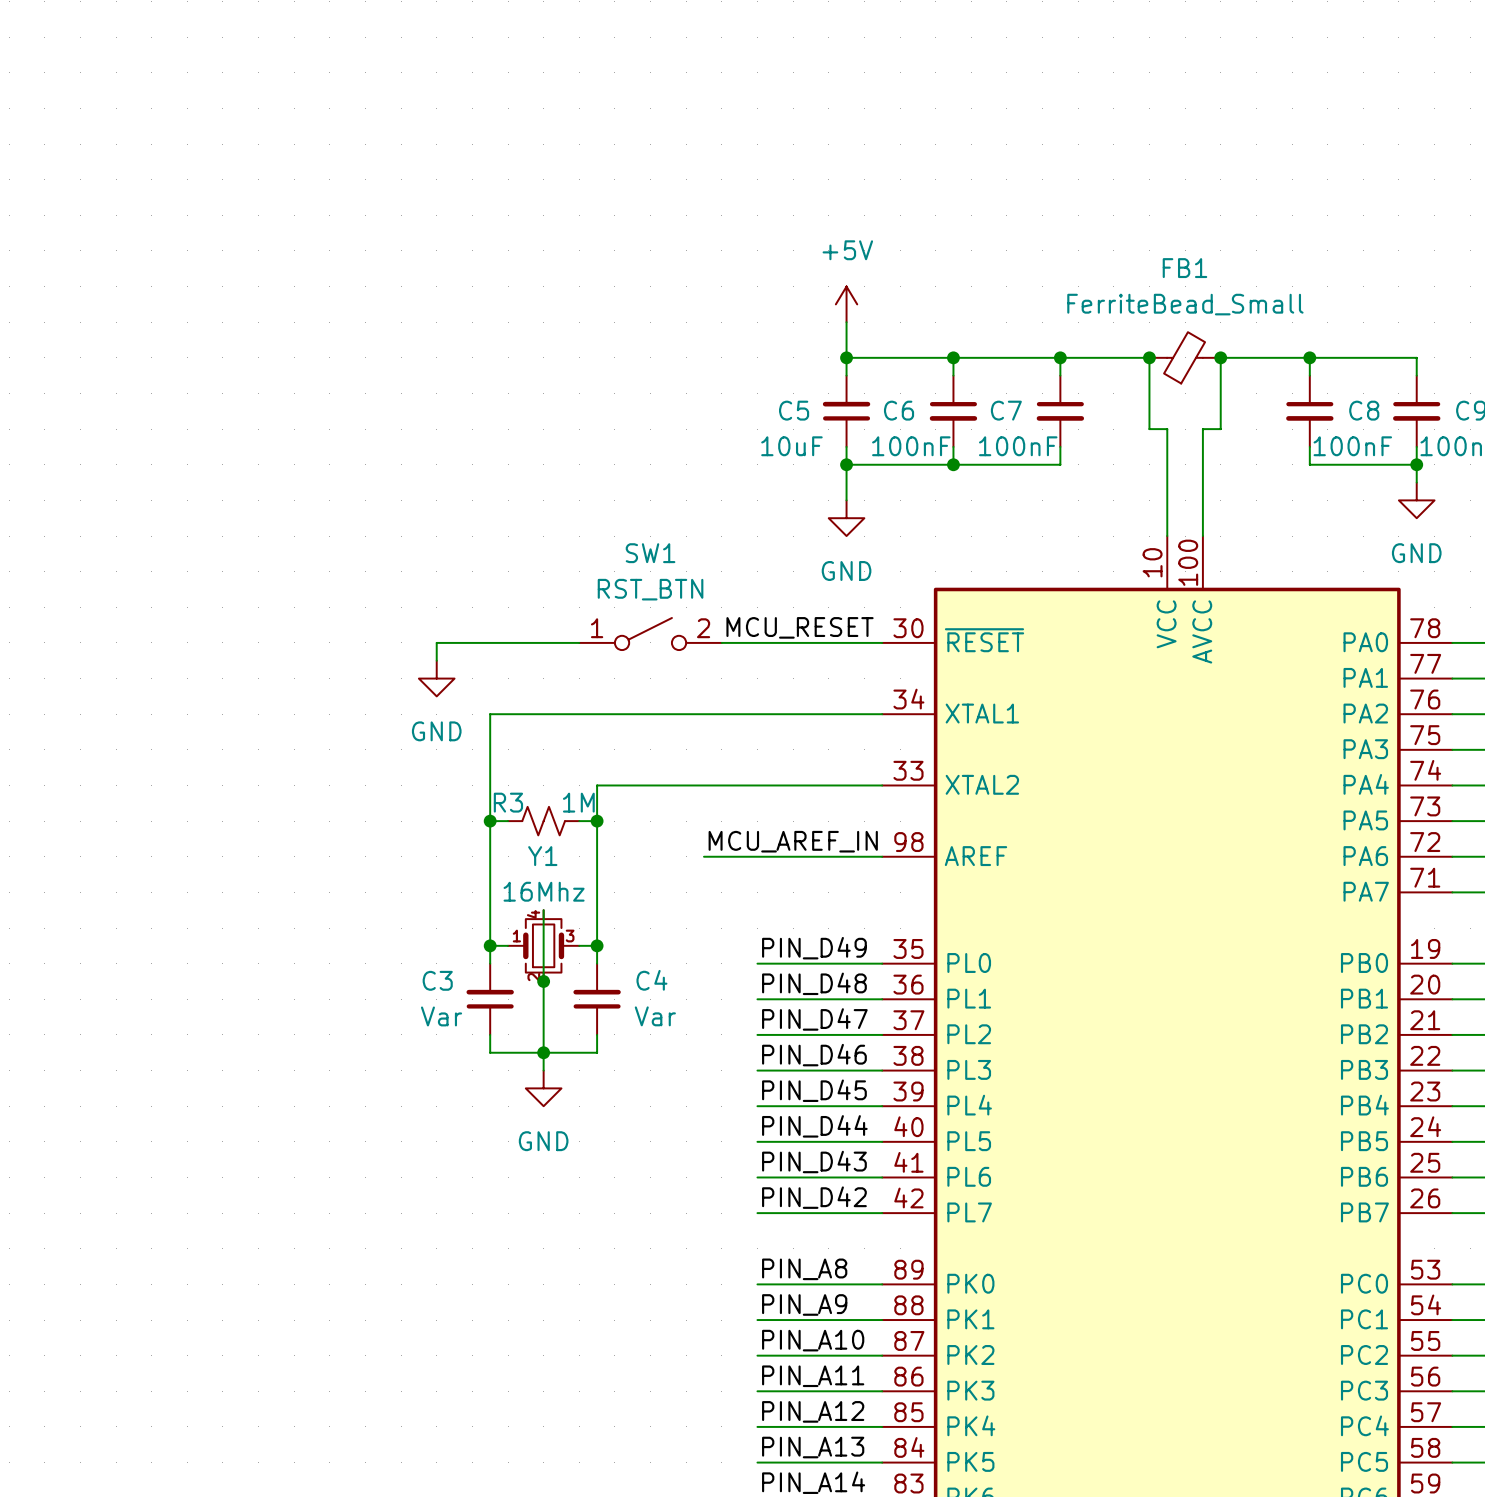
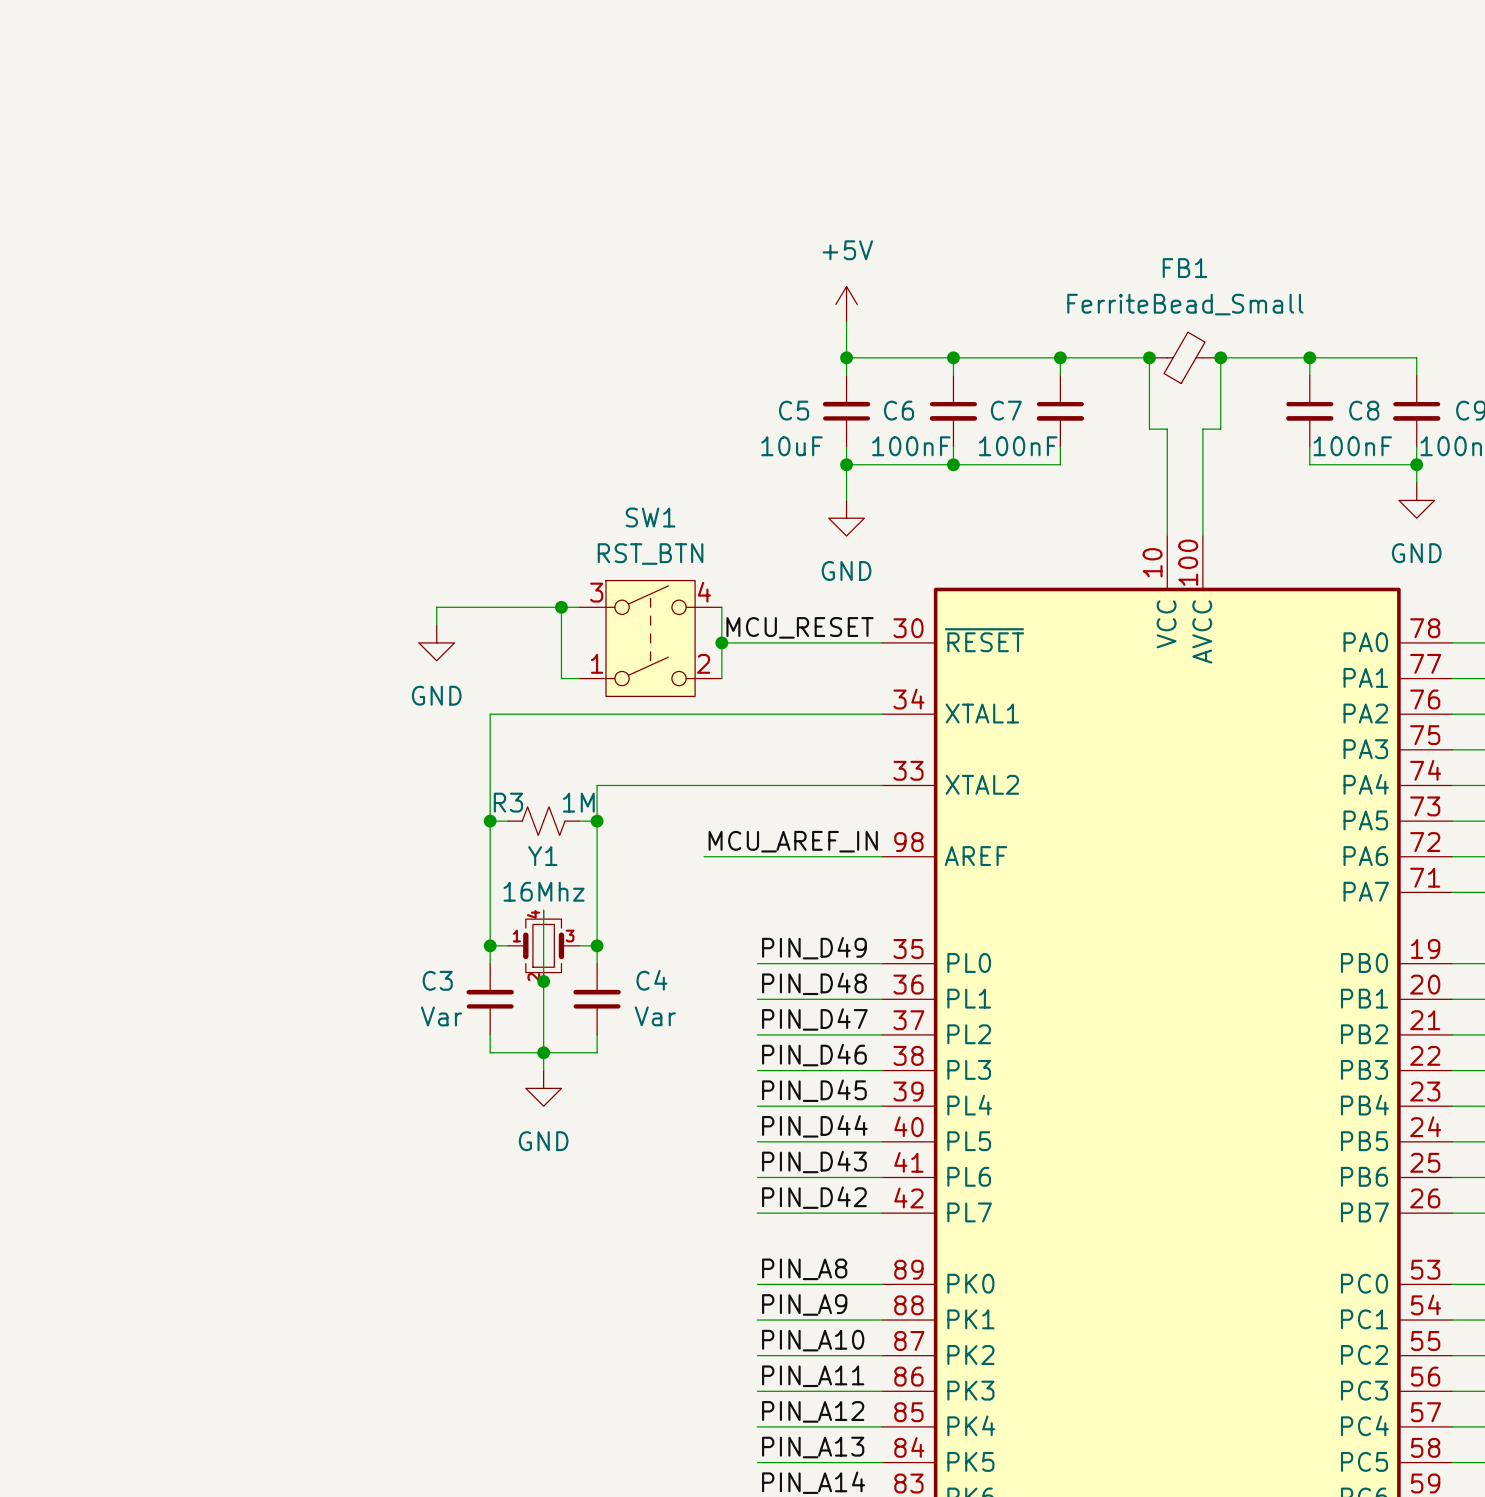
SW1 name position: SW1 (650, 553) -> SW1 (650, 517)
SW1 value position: RST_BTN (650, 589) -> RST_BTN (650, 554)
wire: none -> (561, 607) (561, 678) (579, 678)
junction: none -> (561, 607)
wire: none -> (721, 607) (721, 678)
SW1 symbol: [579, 617, 722, 651] -> [579, 580, 722, 697]
wire: (579, 642) (436, 642) (436, 660) -> (579, 607) (436, 607) (436, 625)
junction: none -> (721, 642)
power symbol position: GND (436, 678) -> GND (436, 642)

